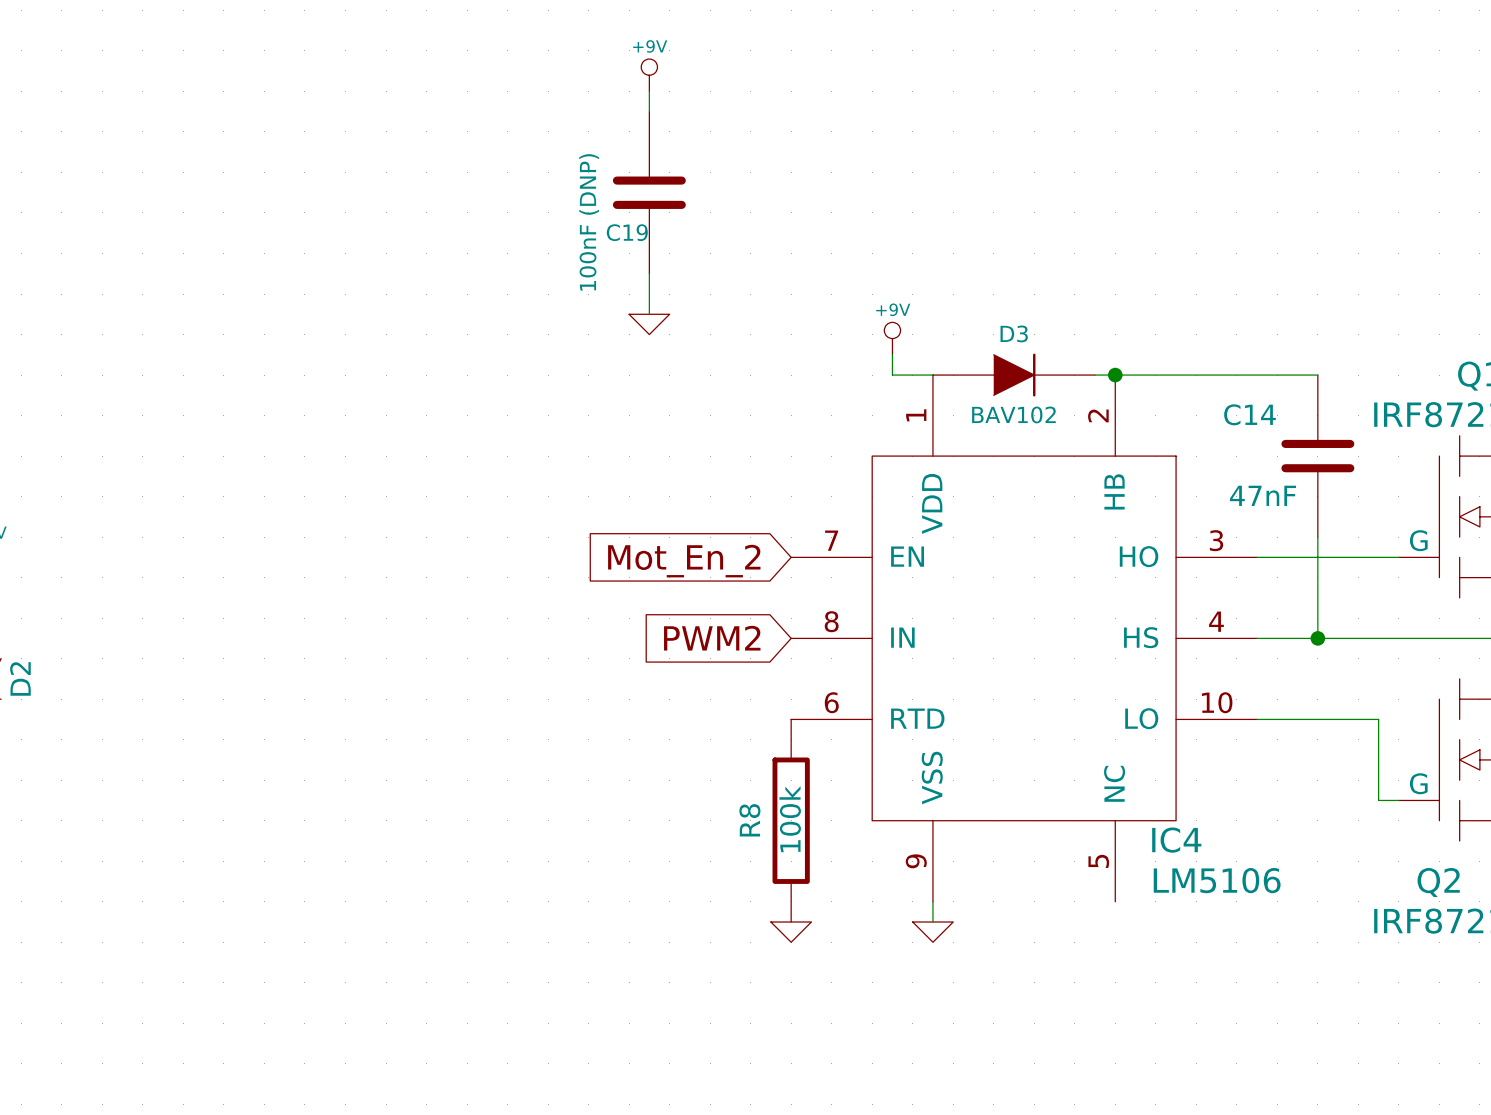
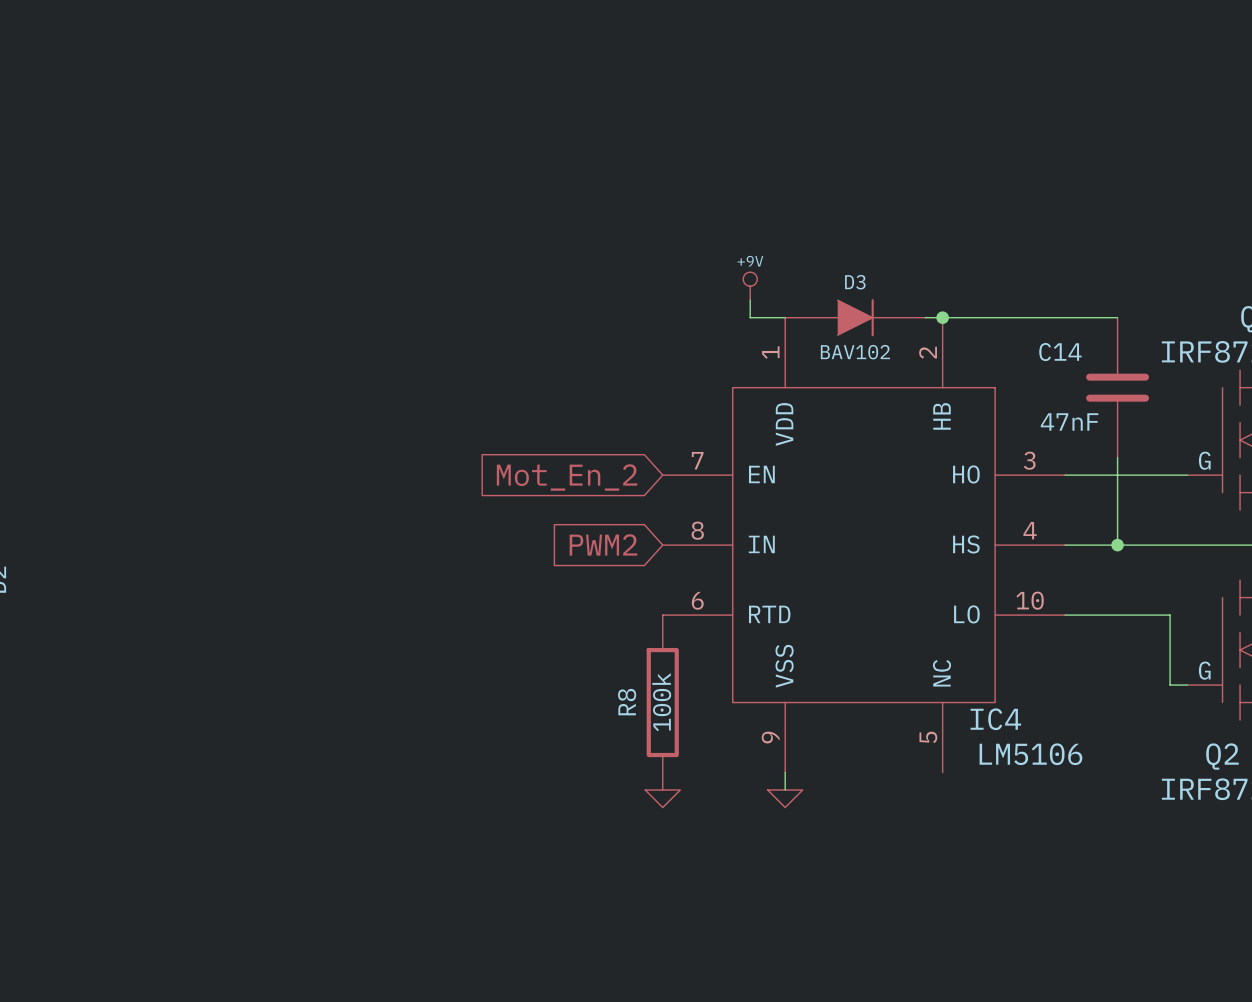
power symbol: +9V (649, 75) -> none
wire: (649, 91) (649, 111) -> none
C19: 100nF (DNP) (649, 192) -> none
wire: (649, 273) (649, 314) -> none
power symbol: (649, 324) -> none

